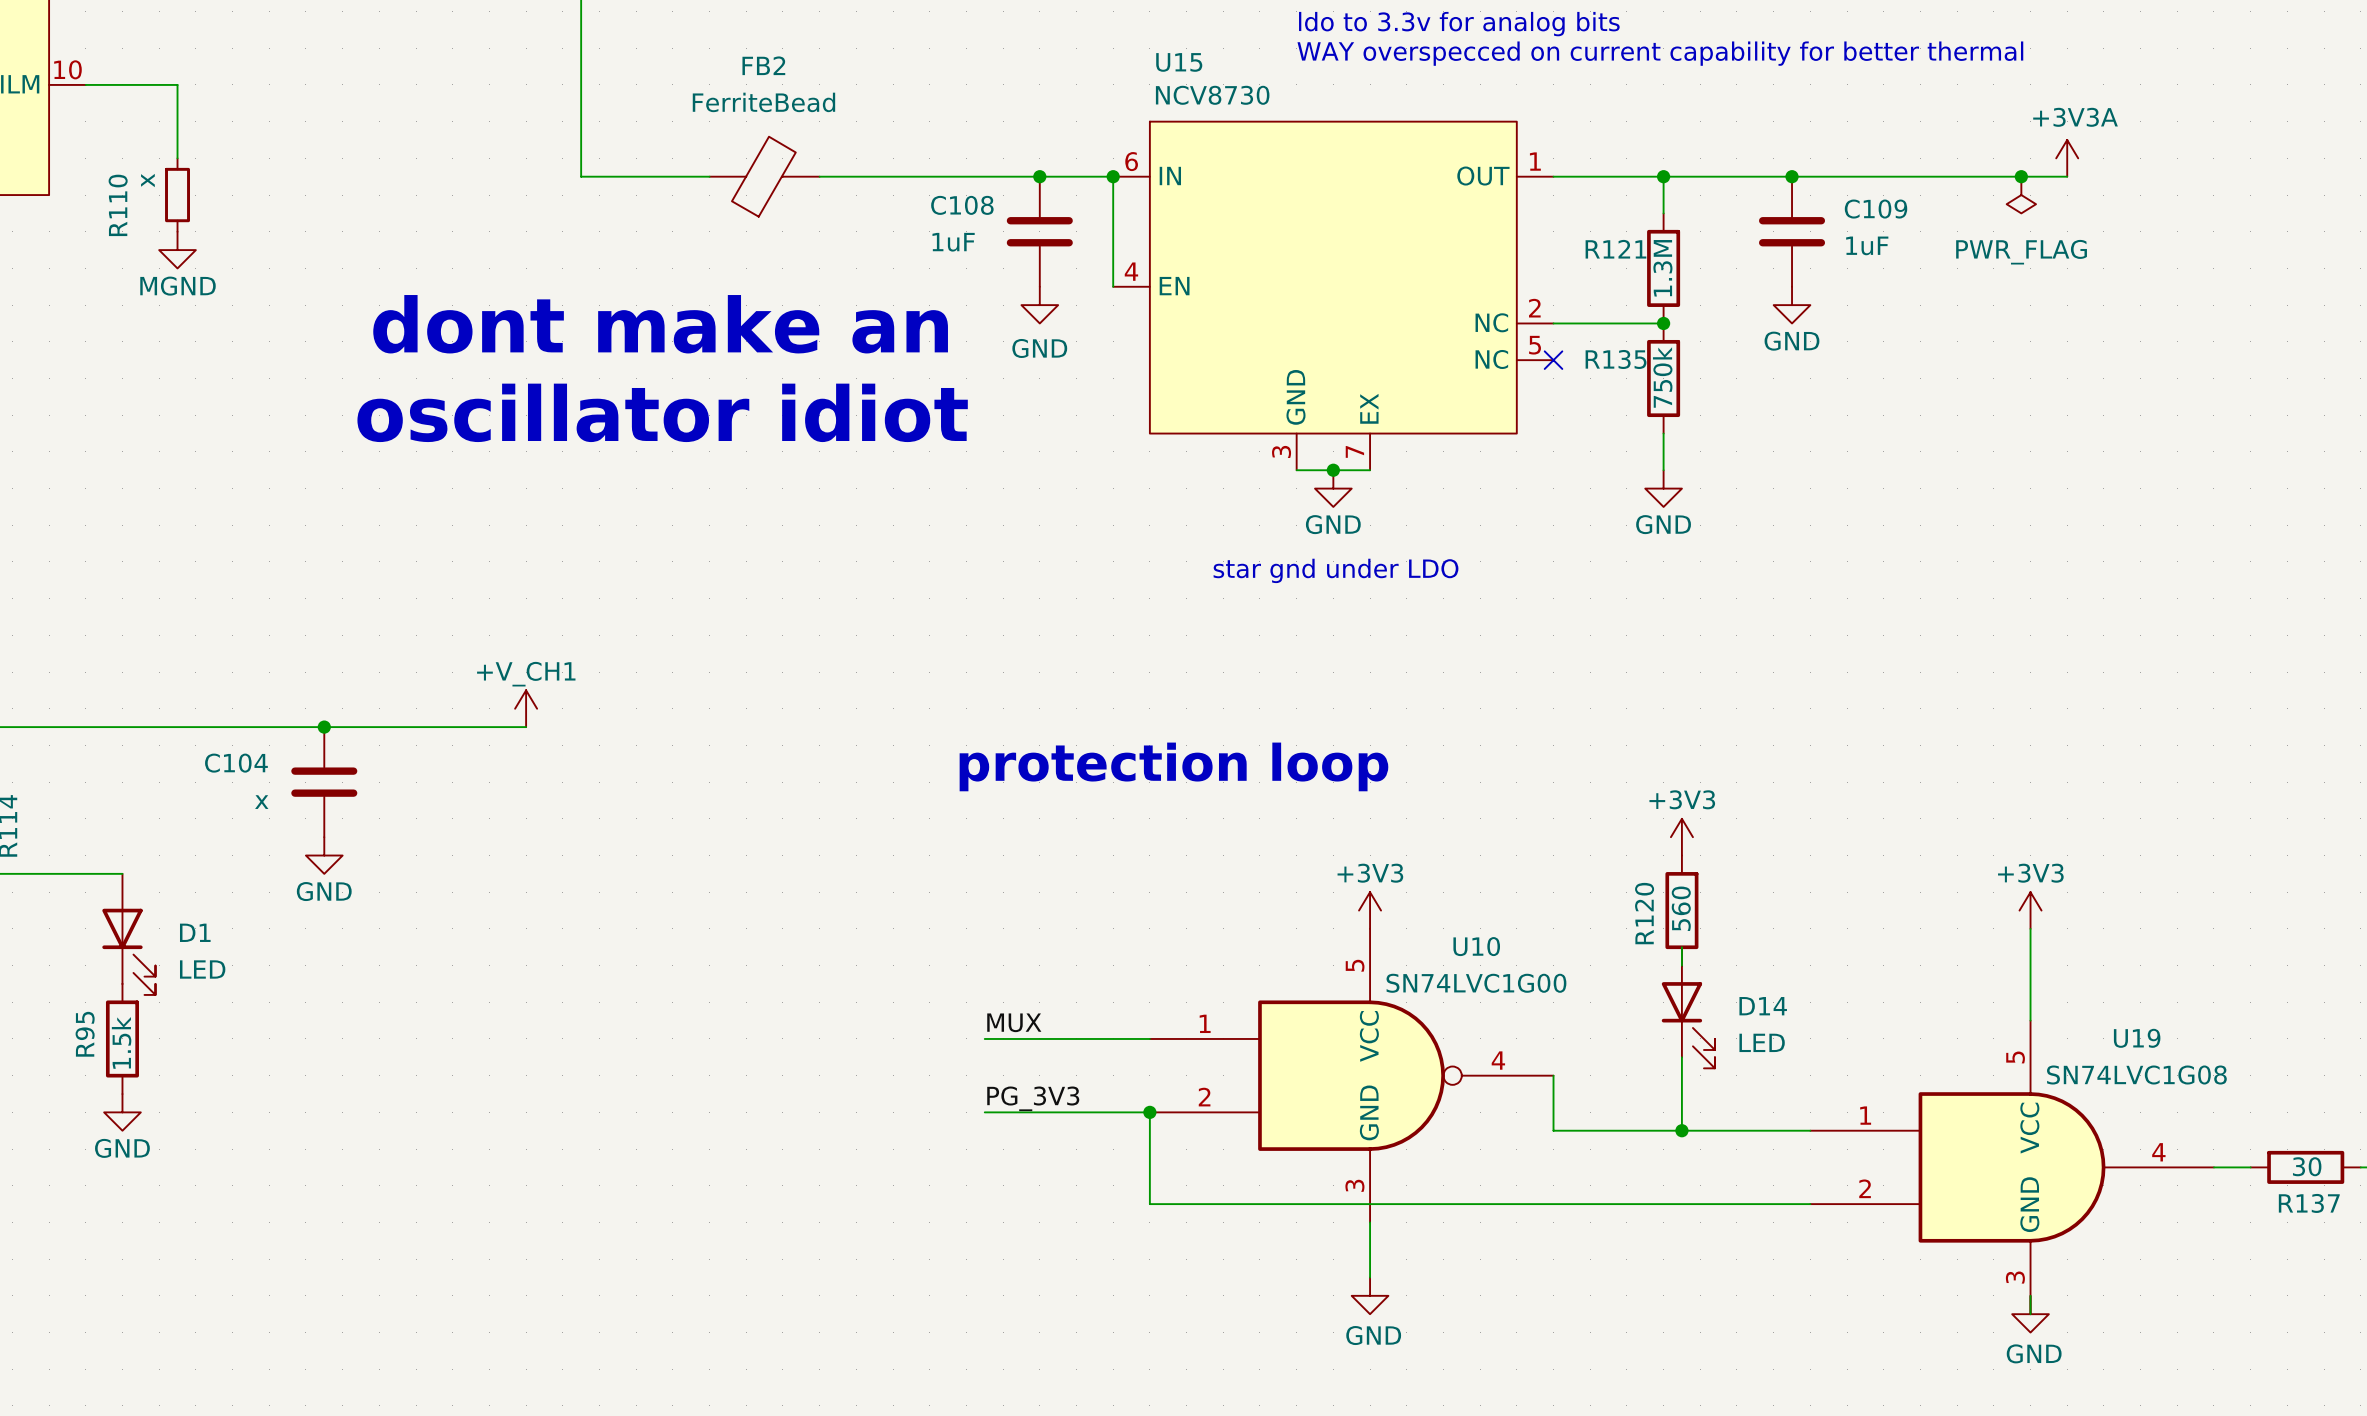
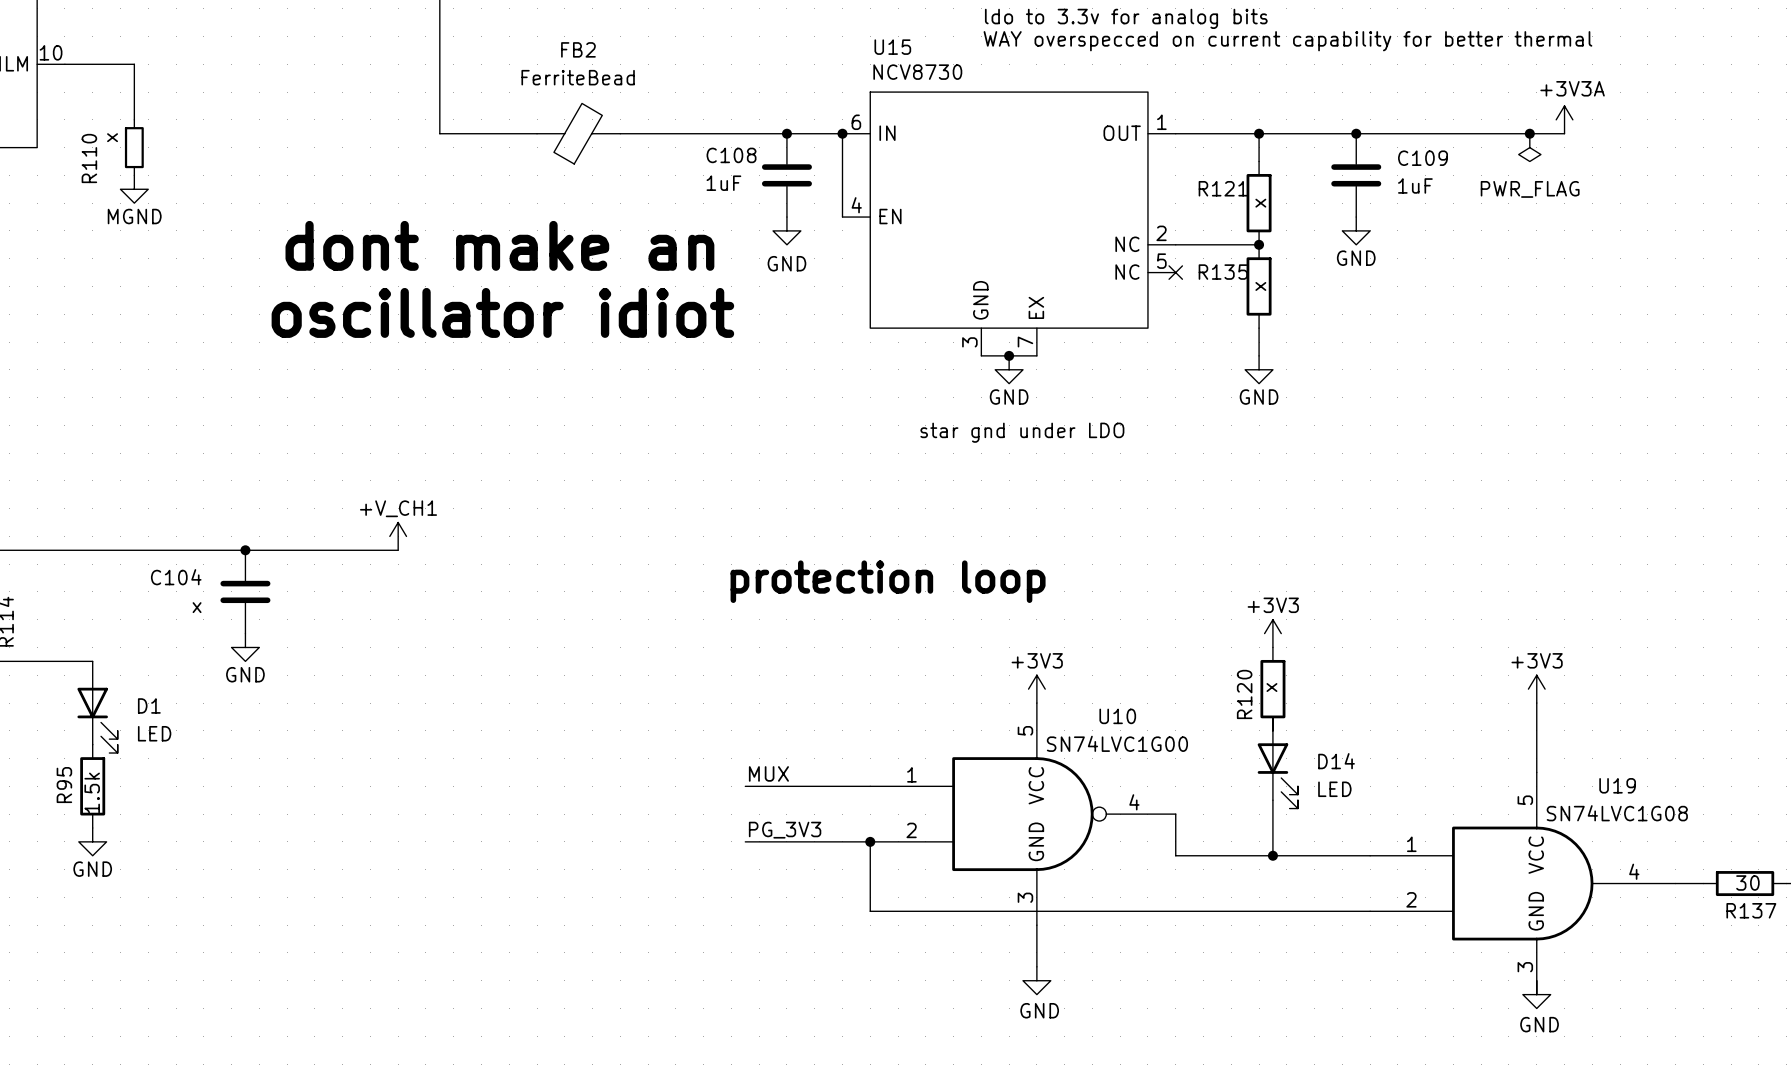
R121 value: 1.3M (1662, 268) -> x (1260, 203)
R135 value: 750k (1662, 377) -> x (1260, 286)
R120 value: 560 (1681, 908) -> x (1271, 687)

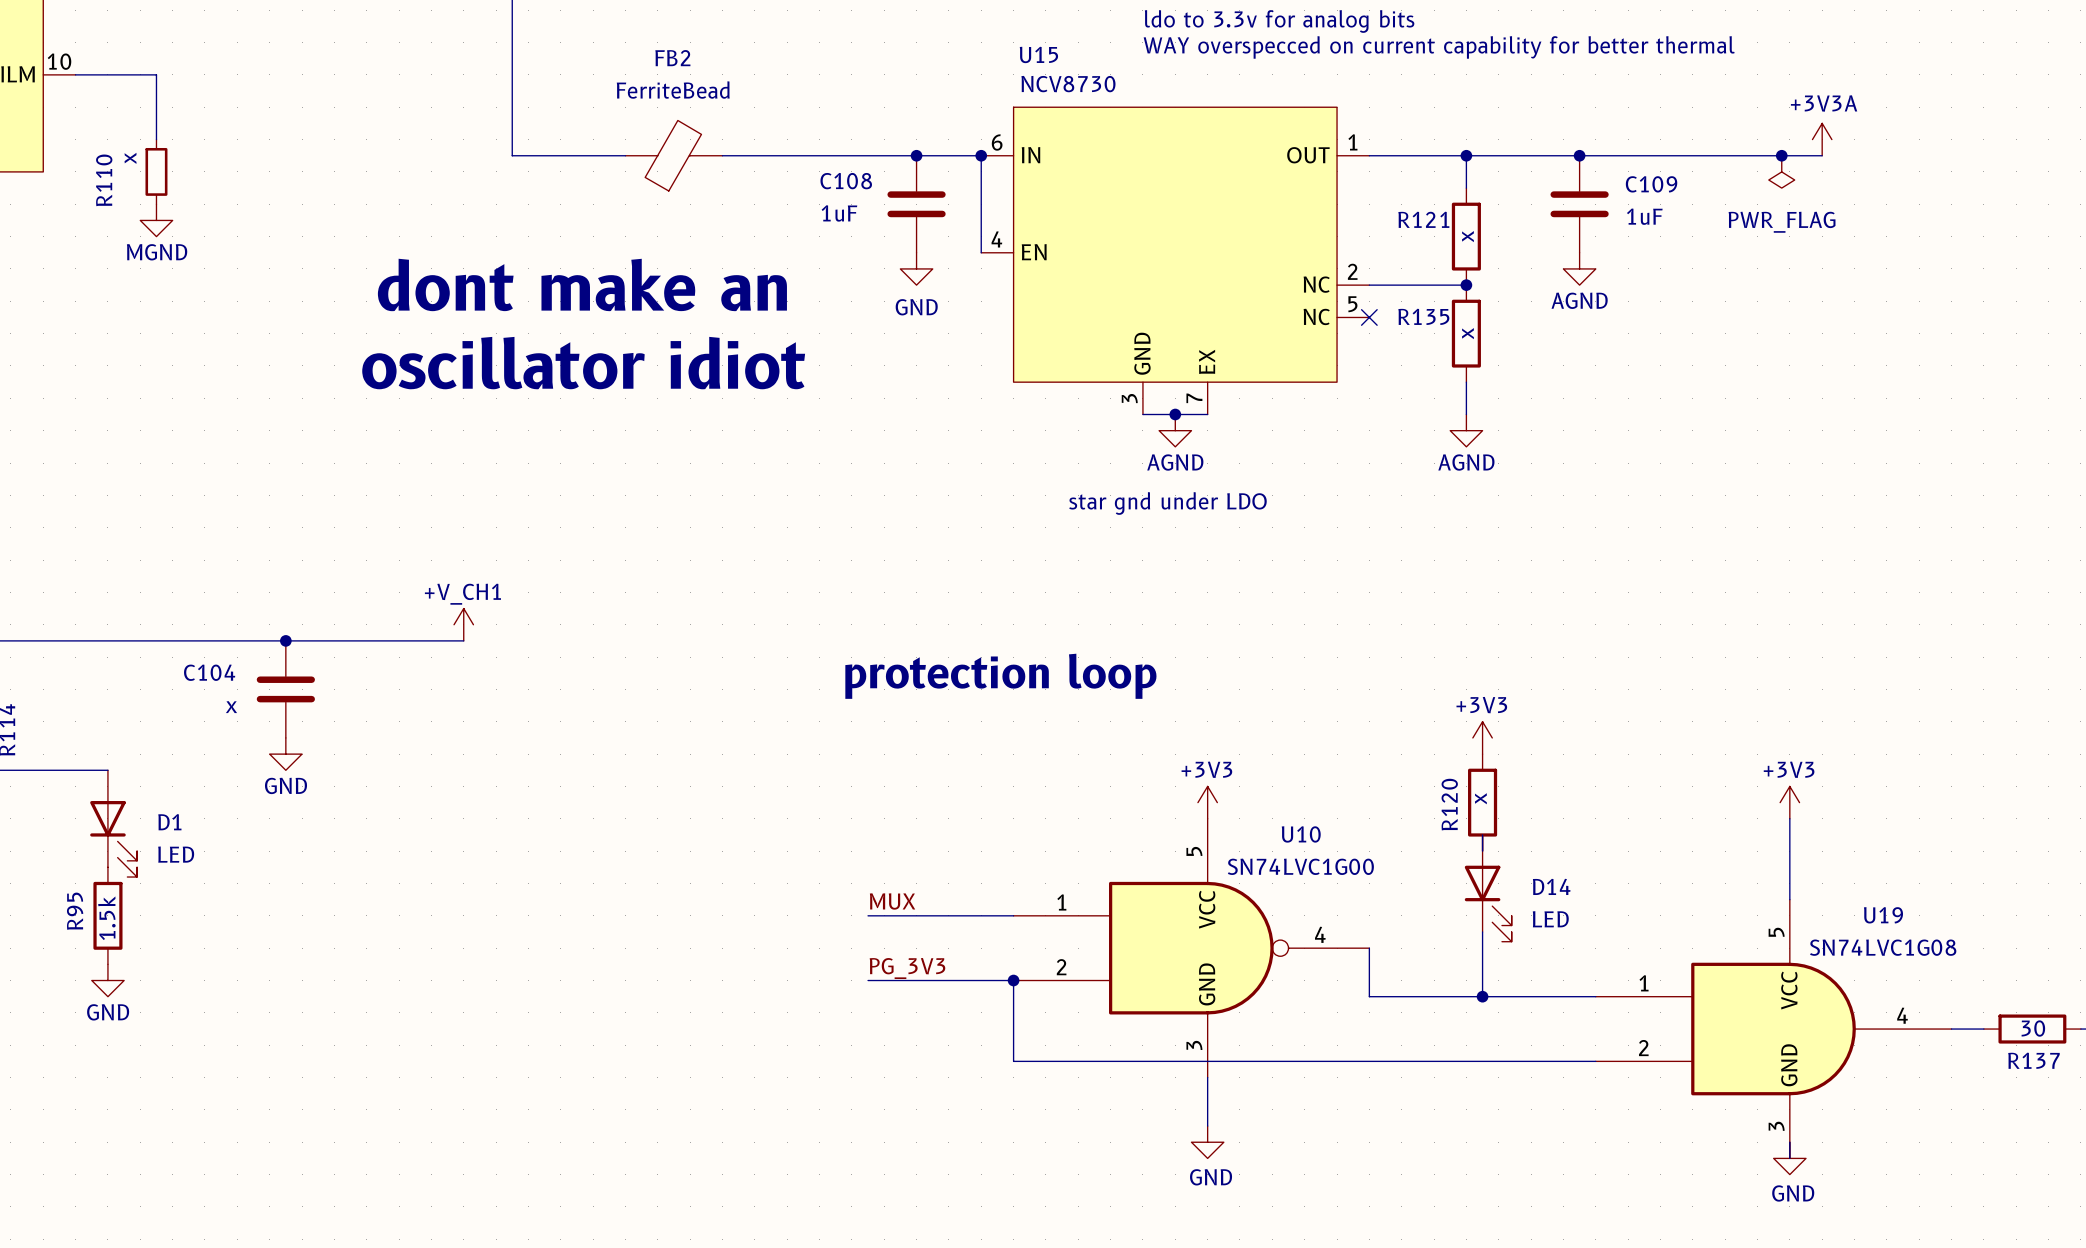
power symbol: GND (1356, 230) -> AGND (1579, 268)
power symbol: GND (1009, 369) -> AGND (1175, 430)
power symbol: GND (1259, 369) -> AGND (1466, 430)

